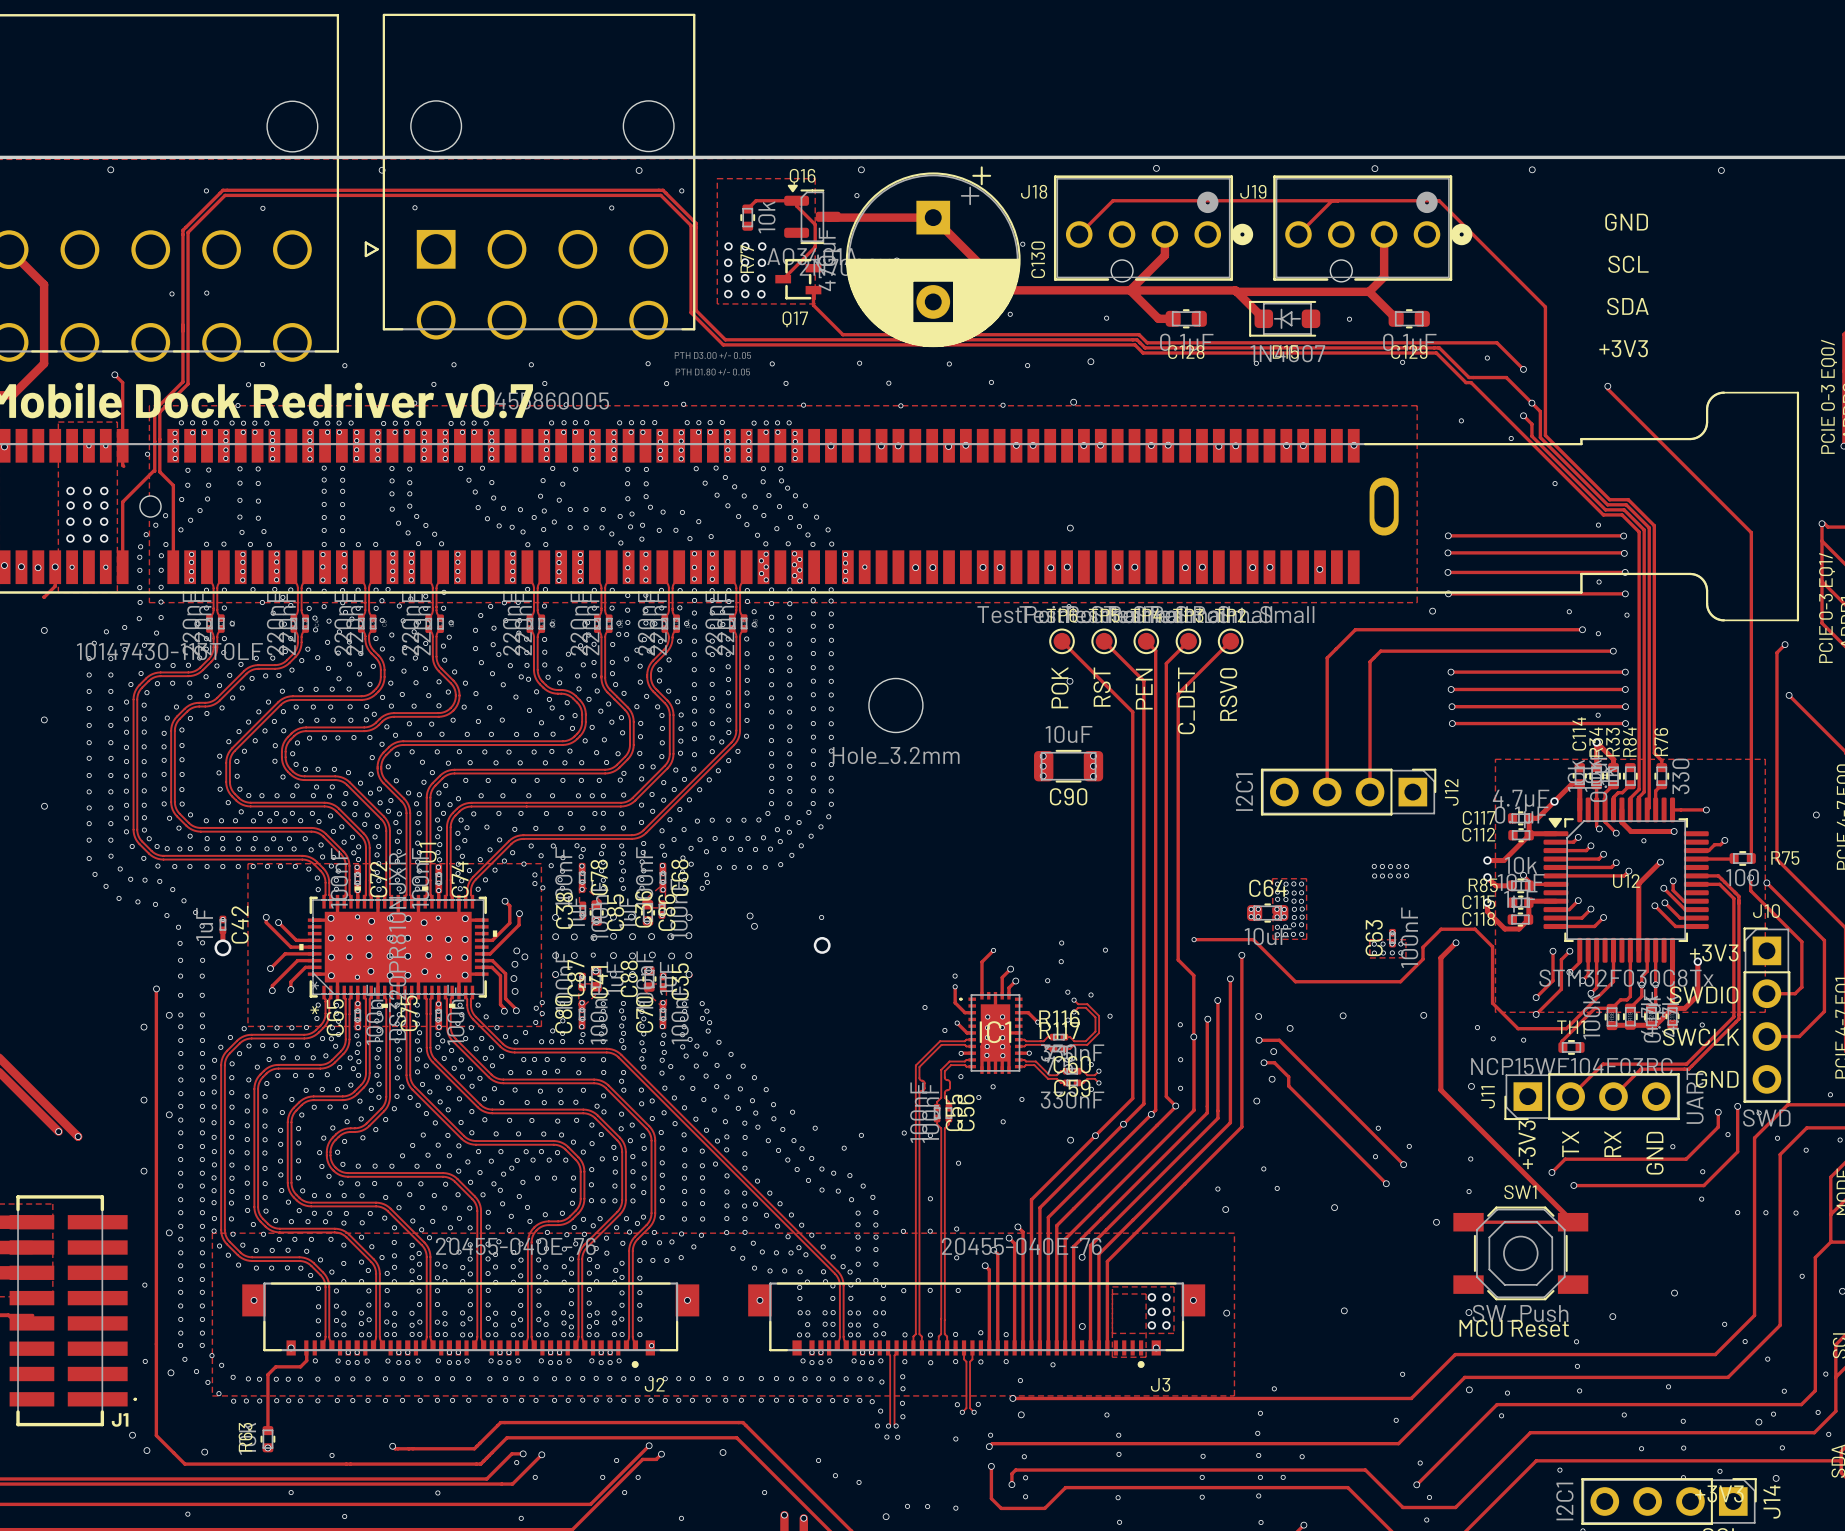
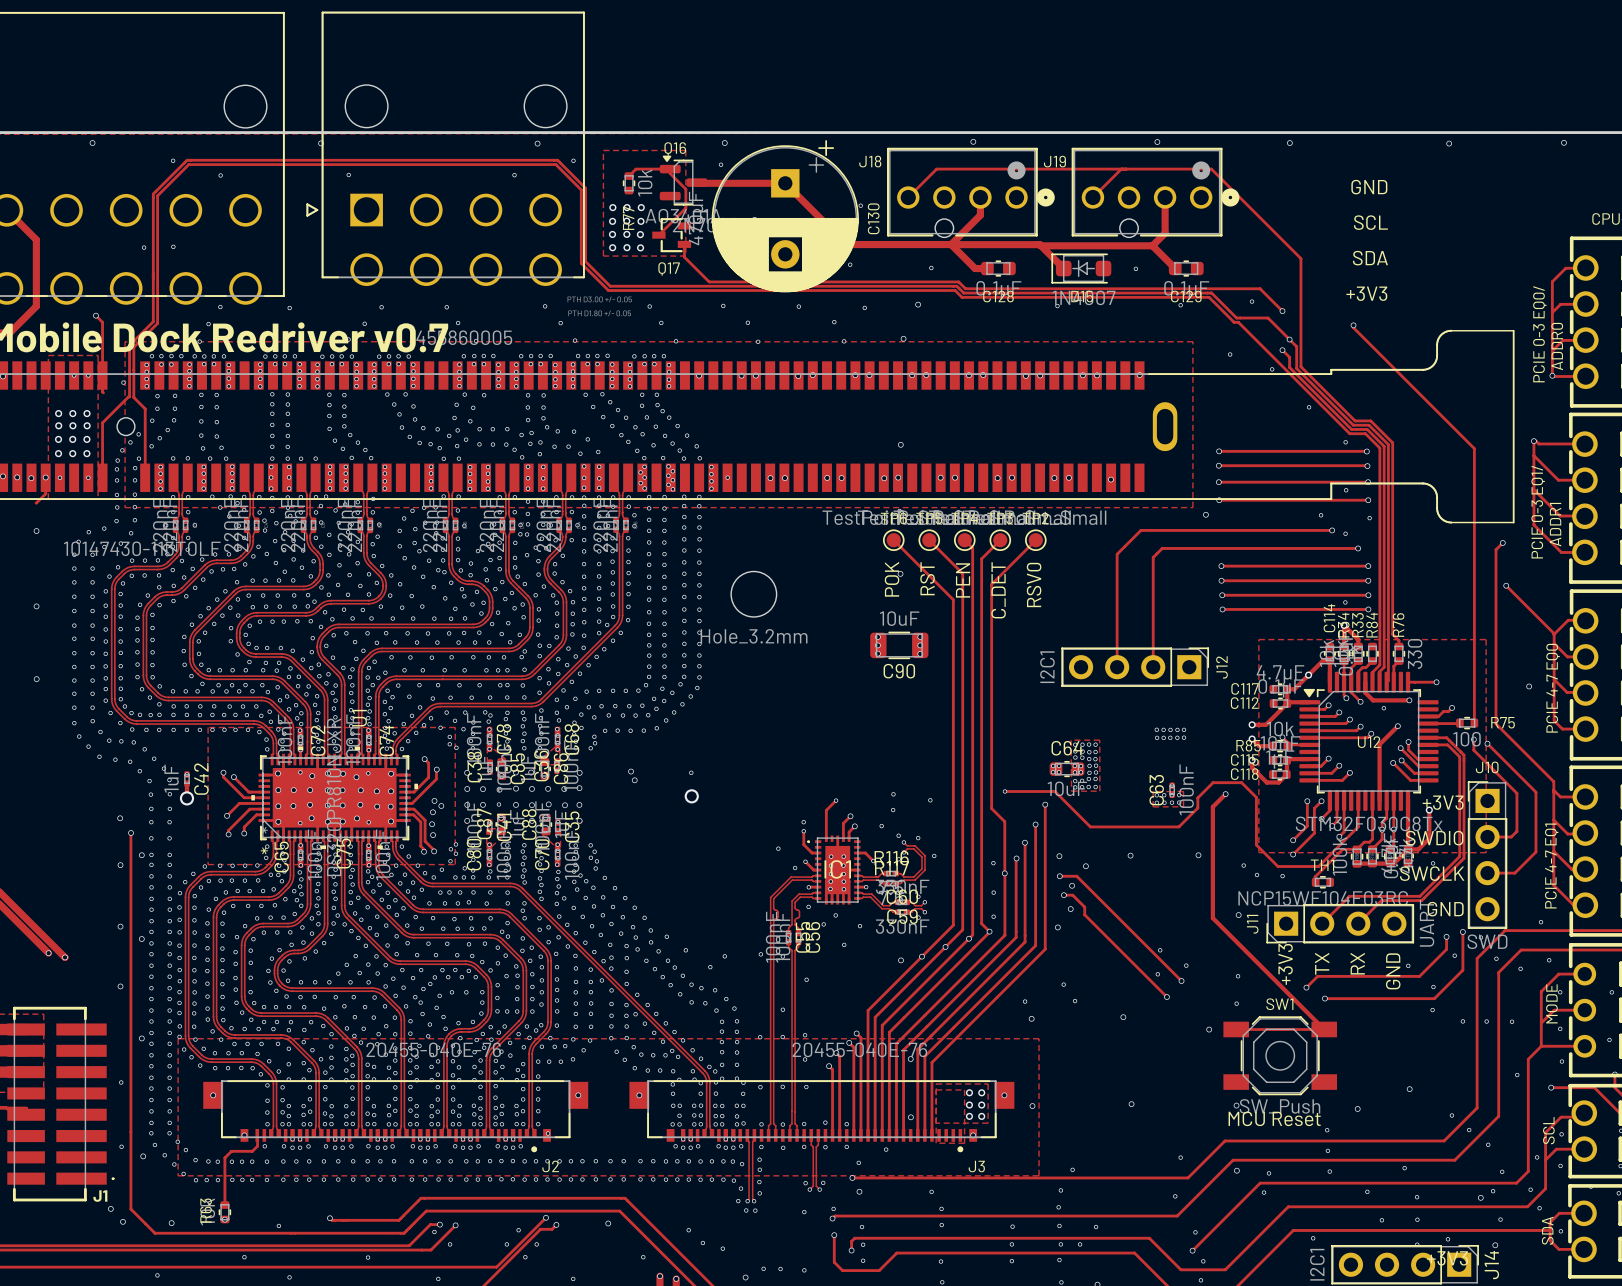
via: none -> (120, 818)

